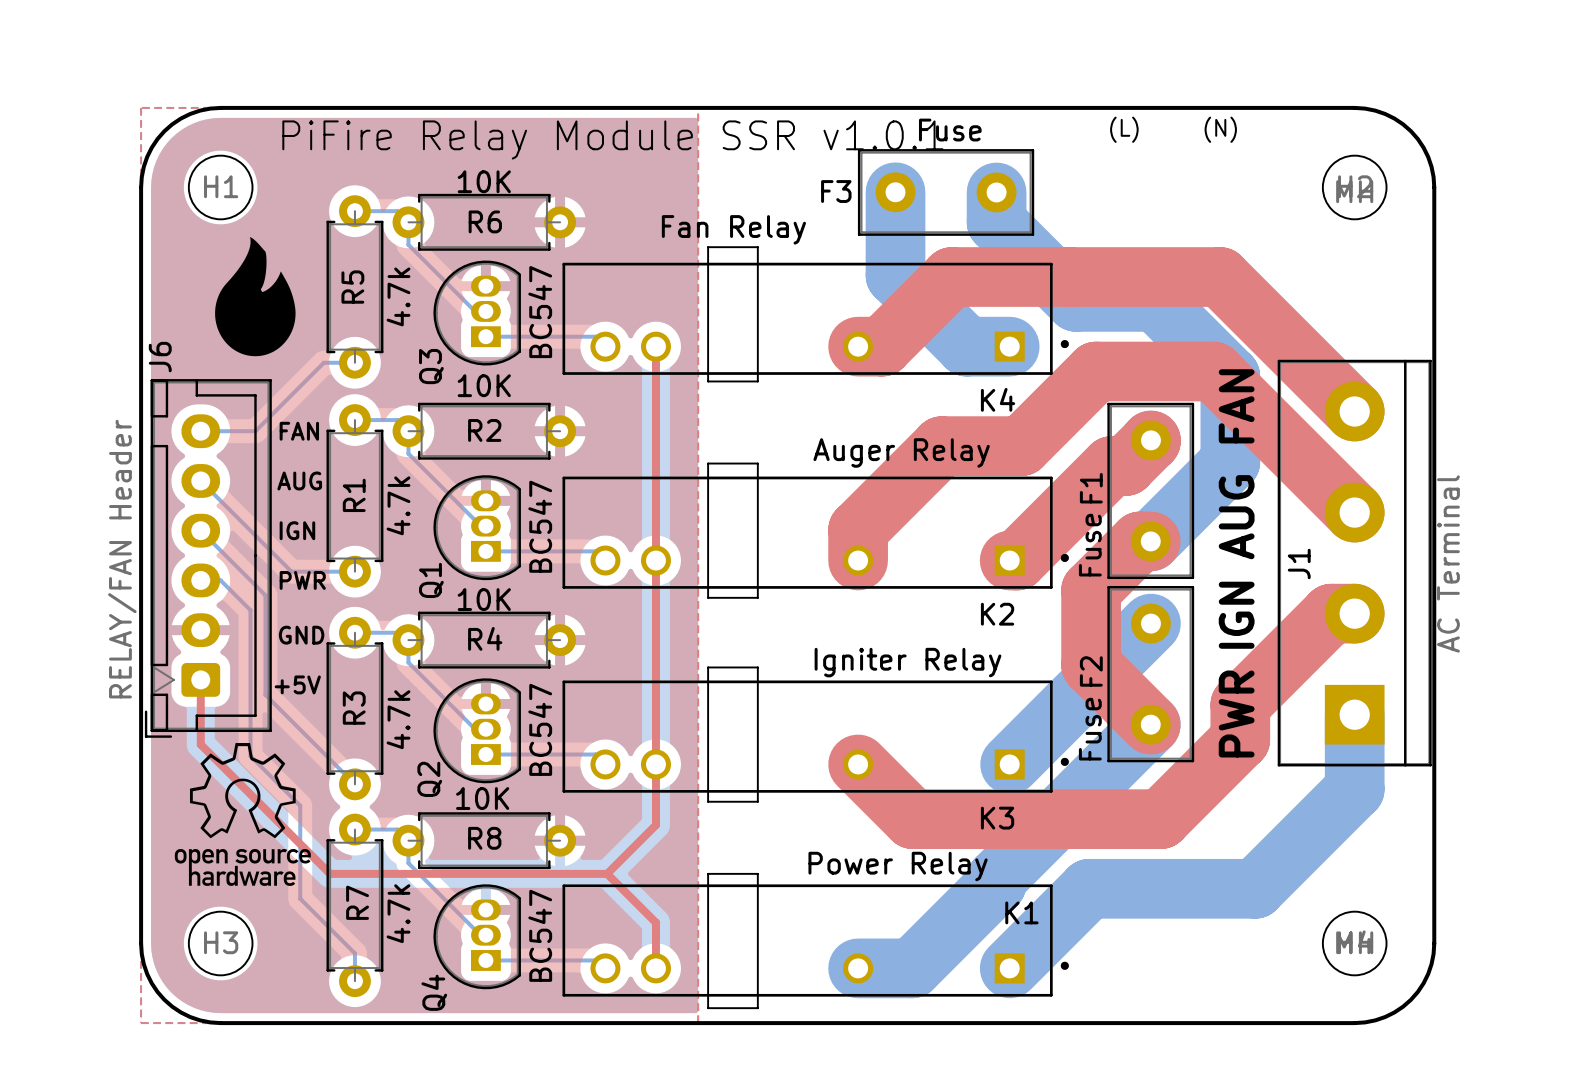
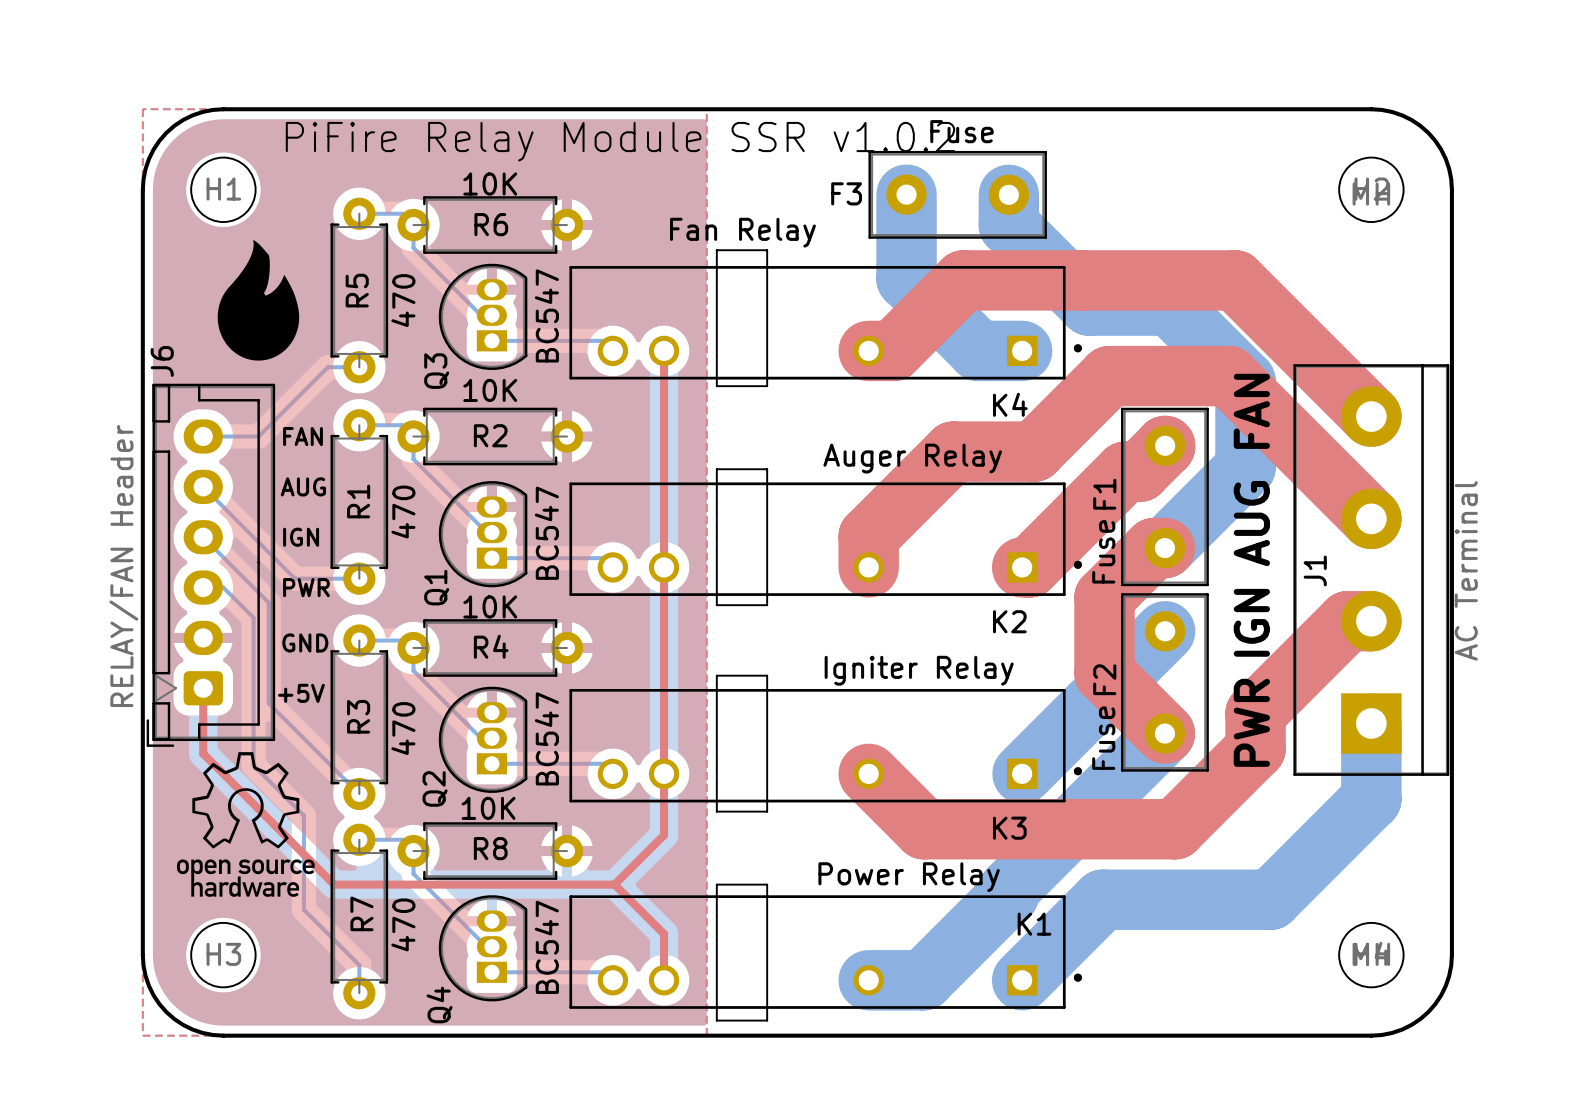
text: (L) (1124, 129) -> none
text: (N) (1220, 129) -> none
text: PiFire Relay Module SSR v1.0.1 (612, 139) -> PiFire Relay Module SSR v1.0.2 (620, 141)
R5 value: 4.7k (398, 296) -> 470 (403, 300)
R1 value: 4.7k (398, 505) -> 470 (403, 512)
R3 value: 4.7k (398, 719) -> 470 (403, 728)
R7 value: 4.7k (398, 913) -> 470 (403, 924)

